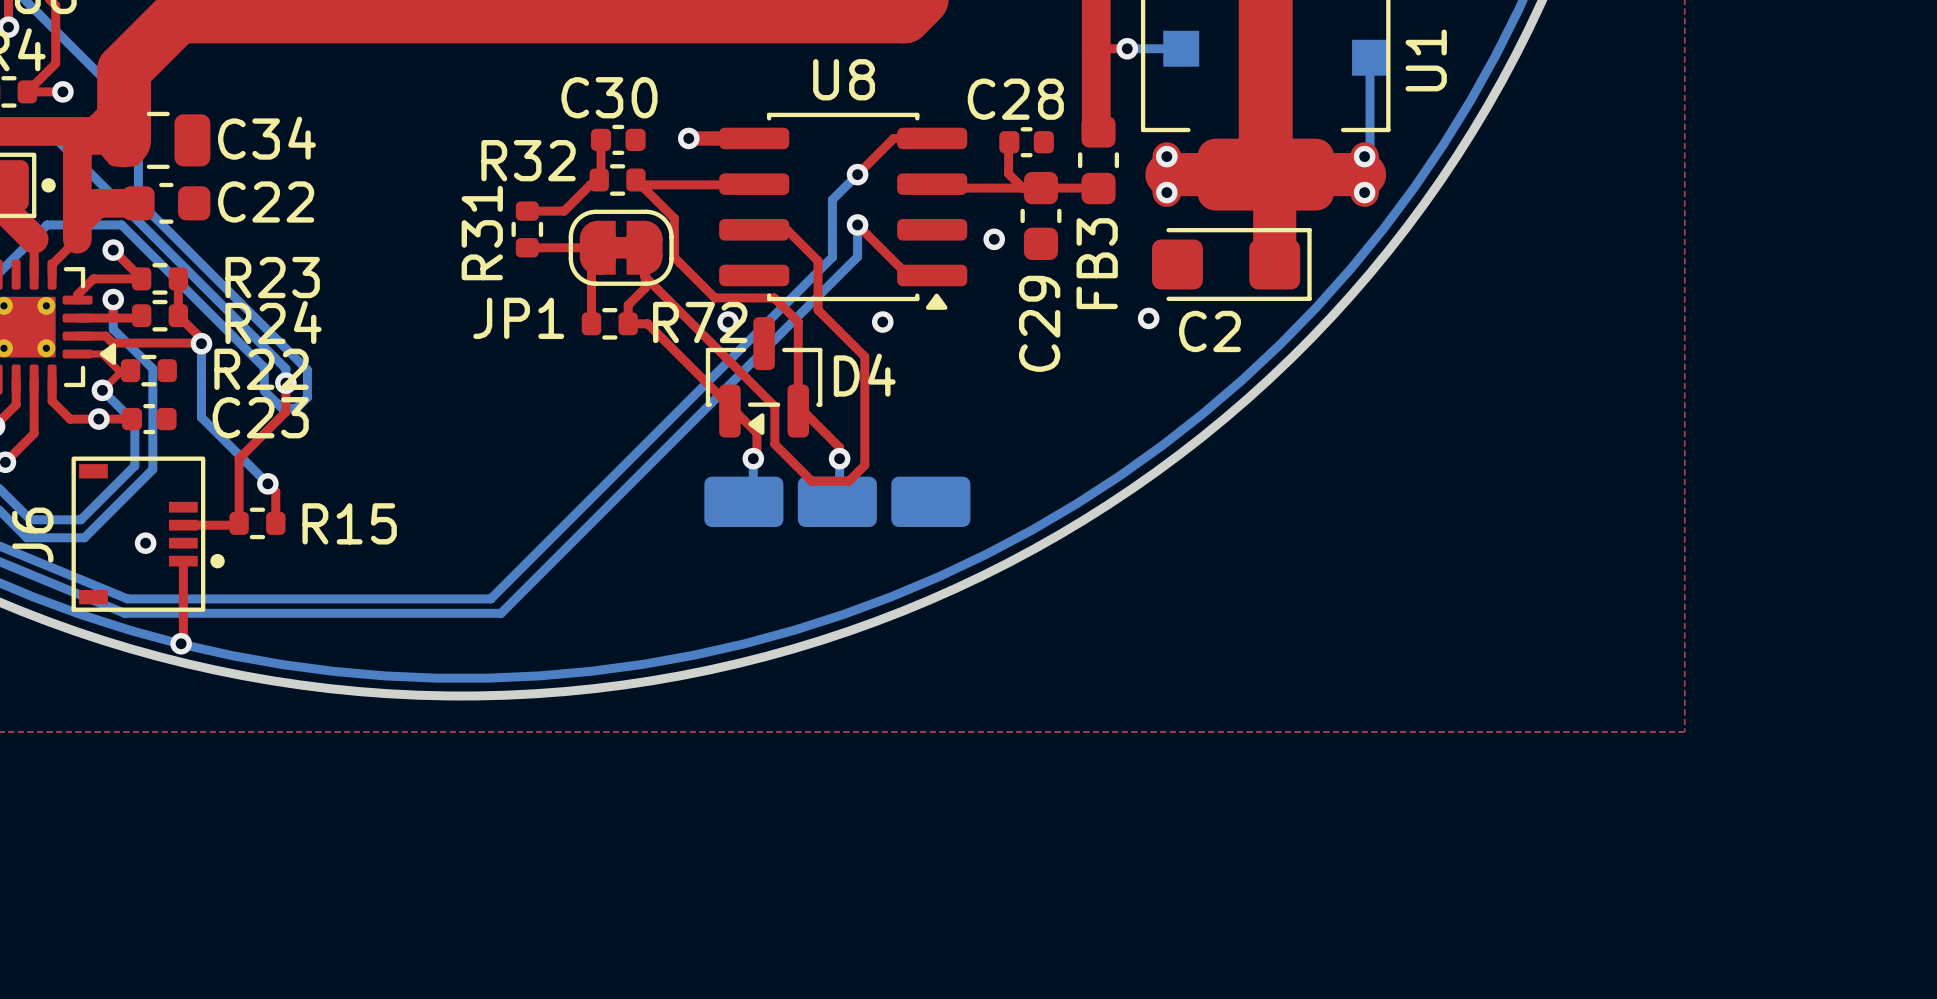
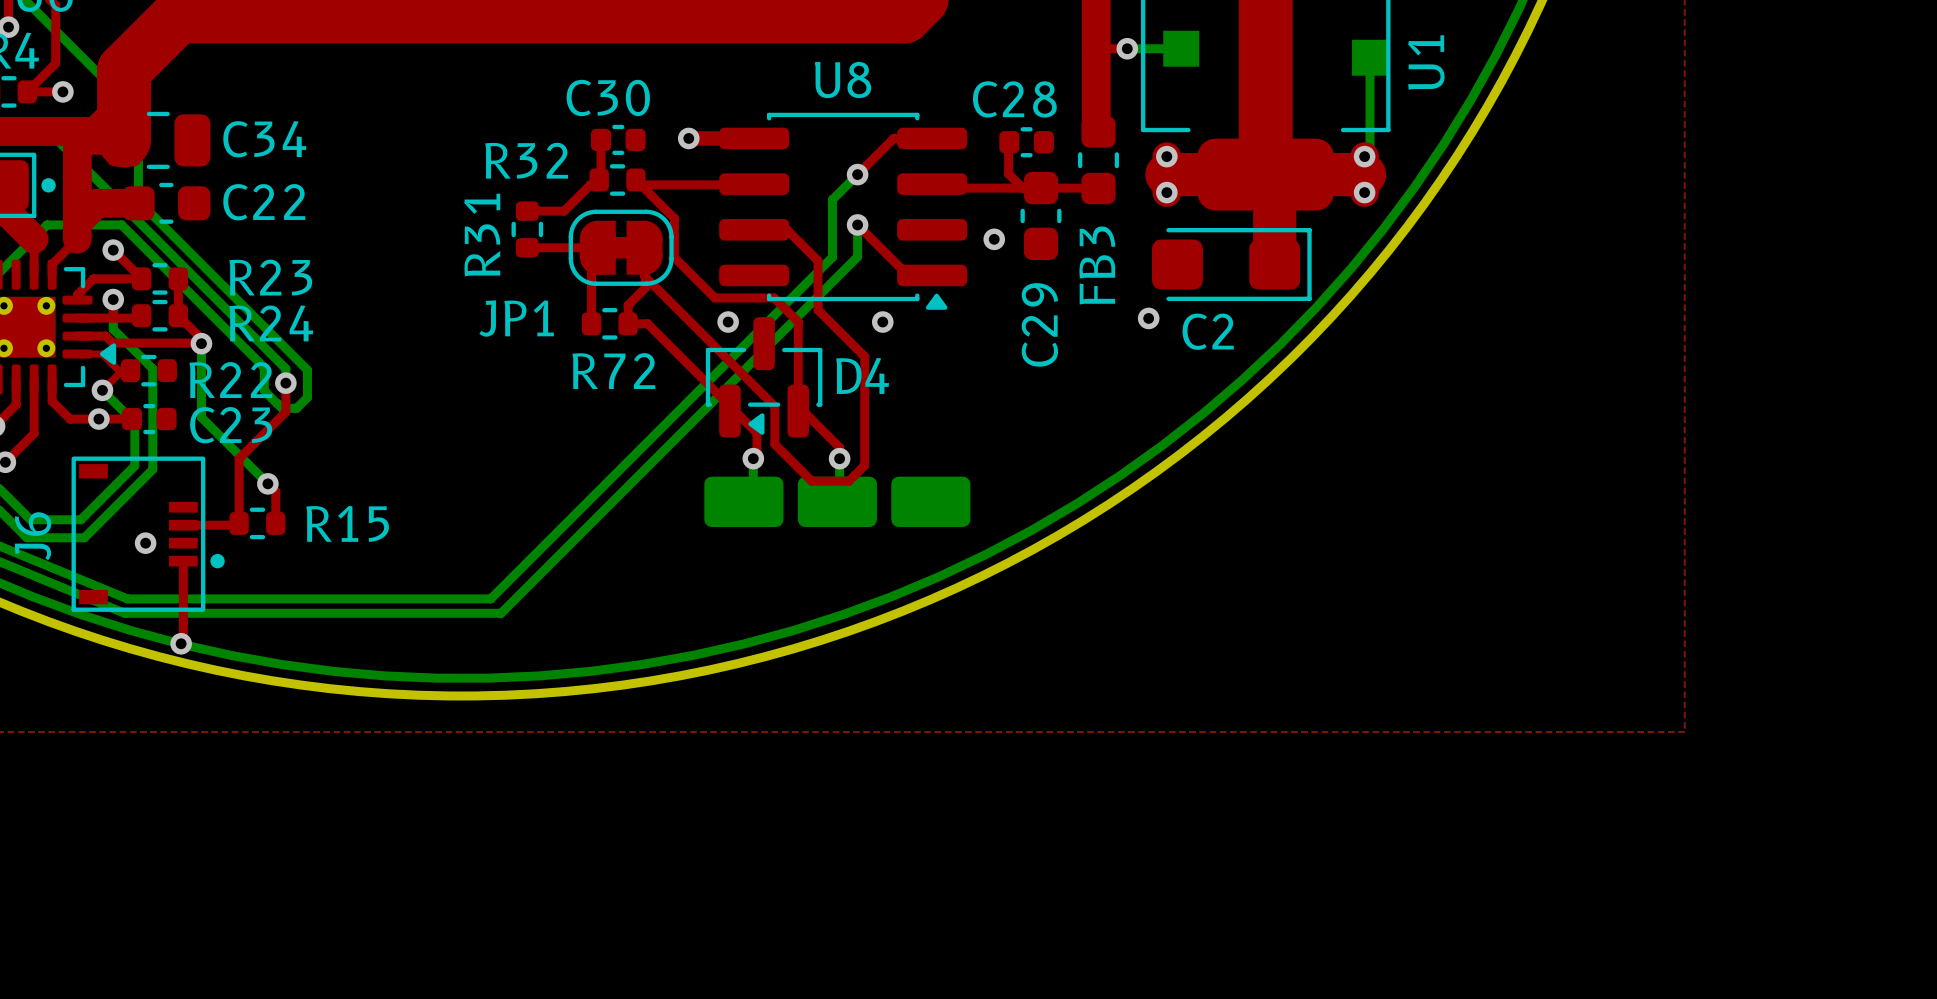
R72 name position: R72 (700, 322) -> R72 (613, 371)
R22 name position: R22 (261, 369) -> R22 (230, 380)
C23 name position: C23 (260, 417) -> C23 (231, 425)

